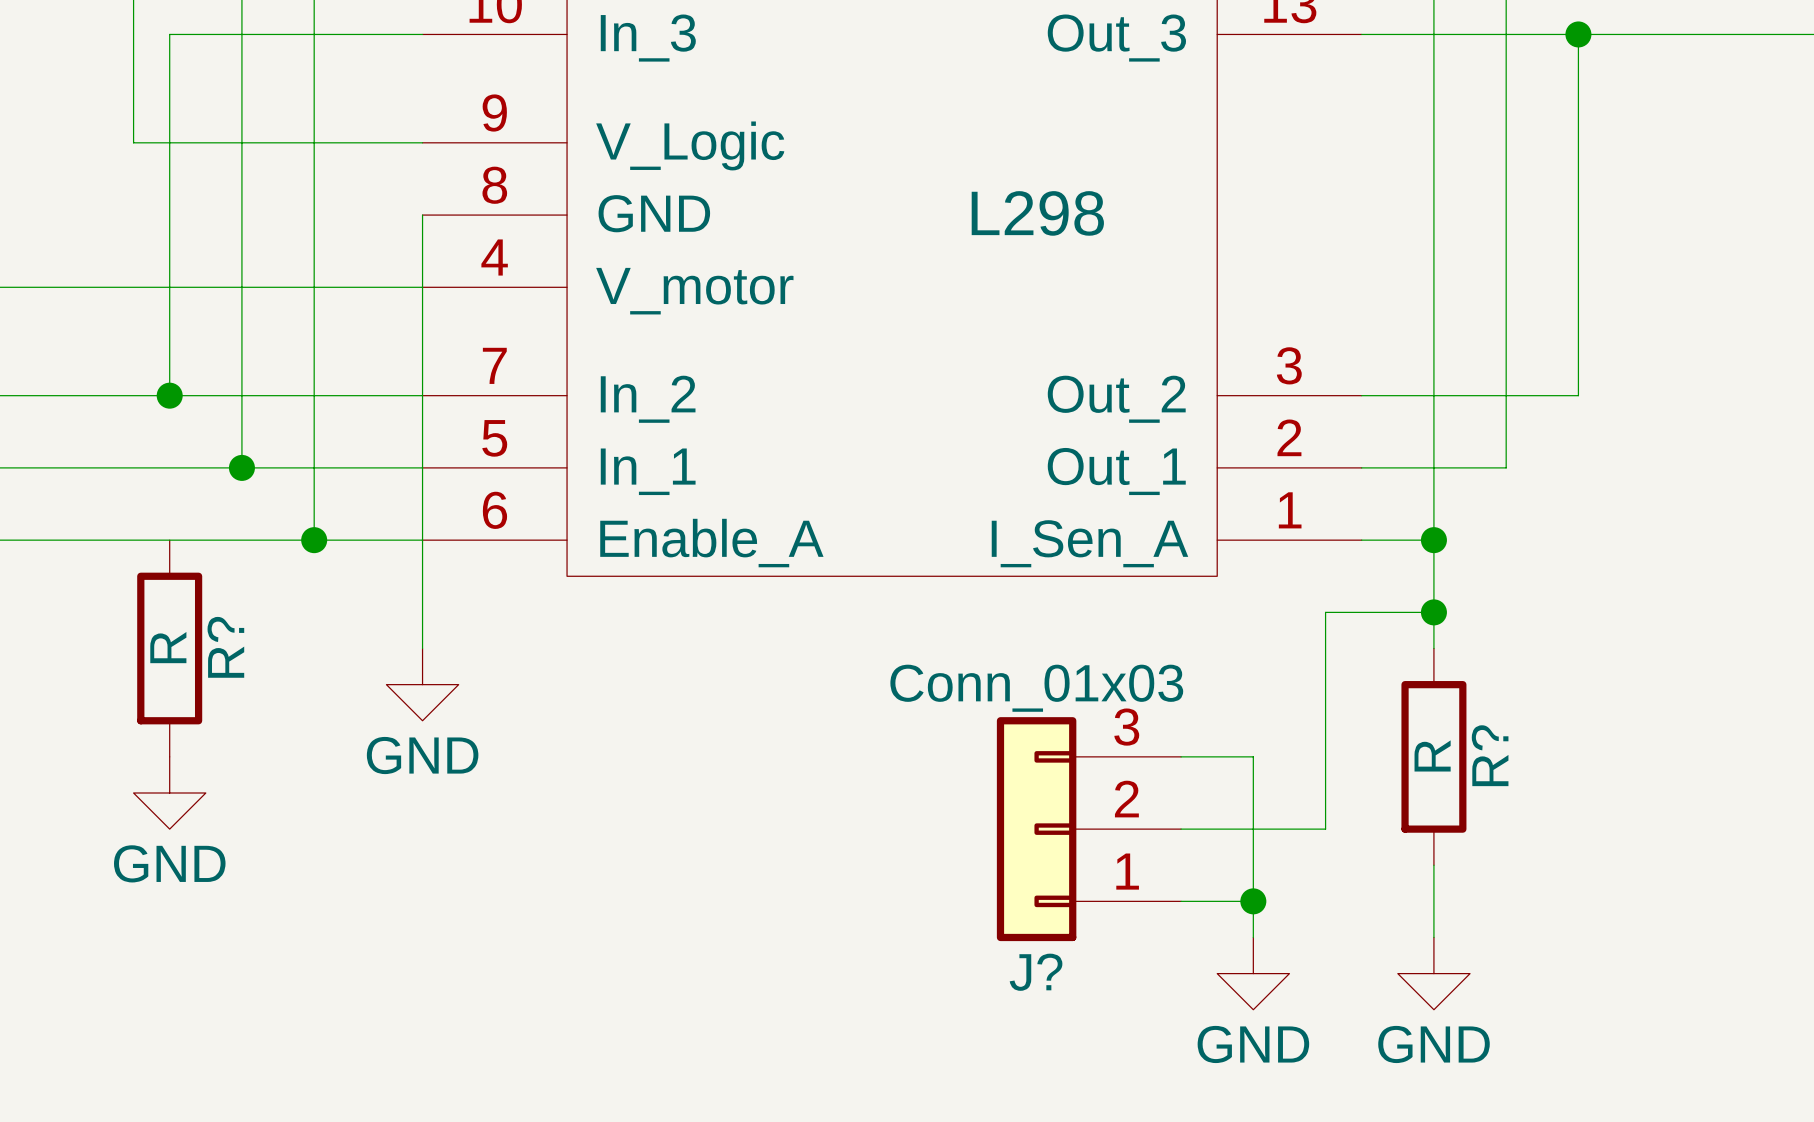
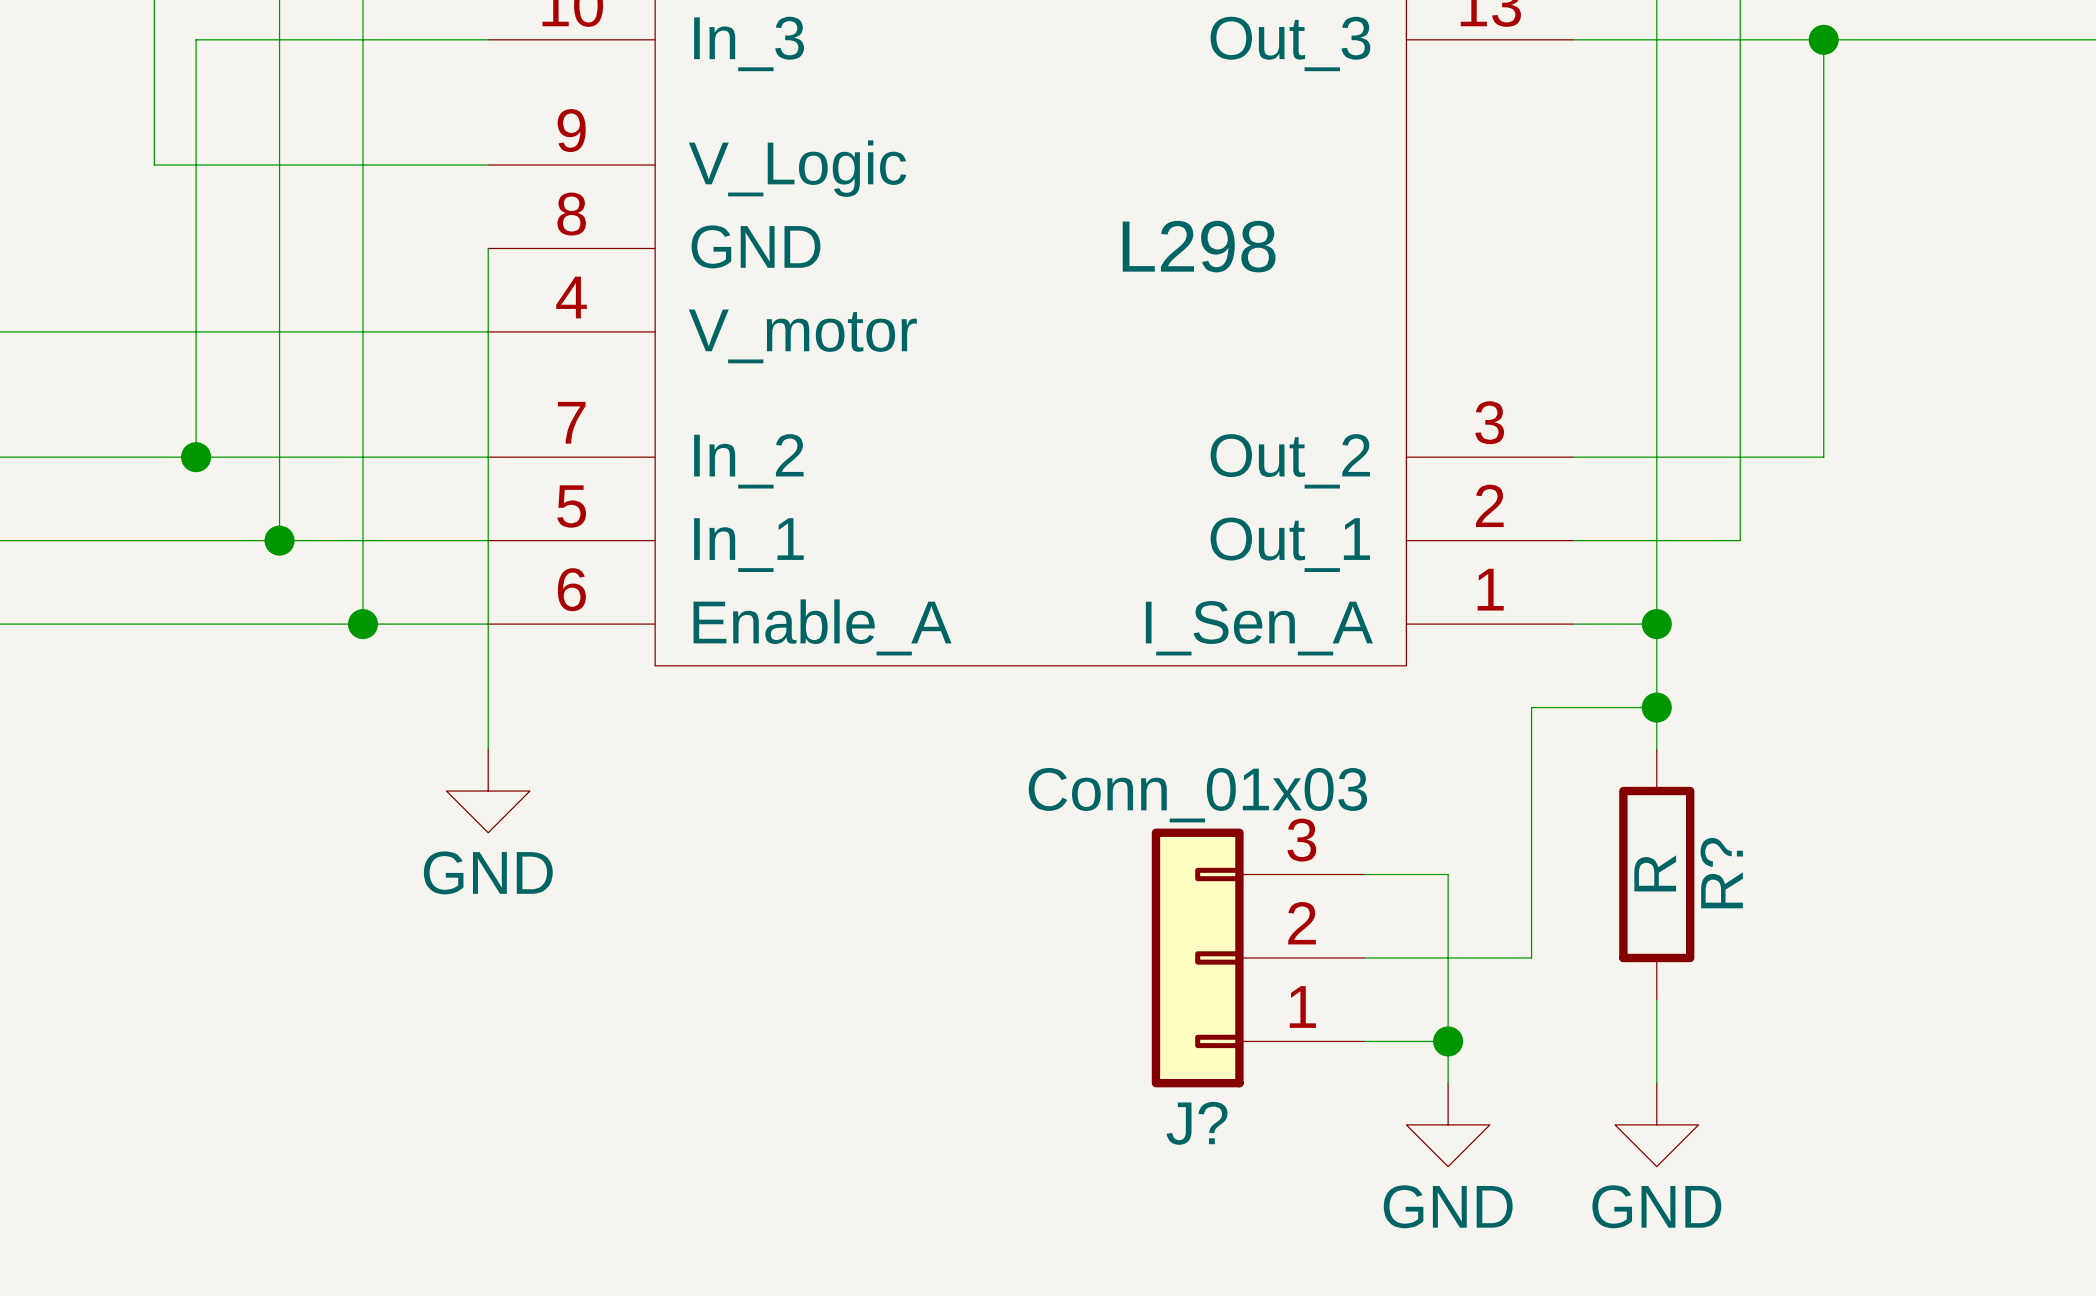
R?: R (169, 648) -> none
power symbol: GND (169, 793) -> none

